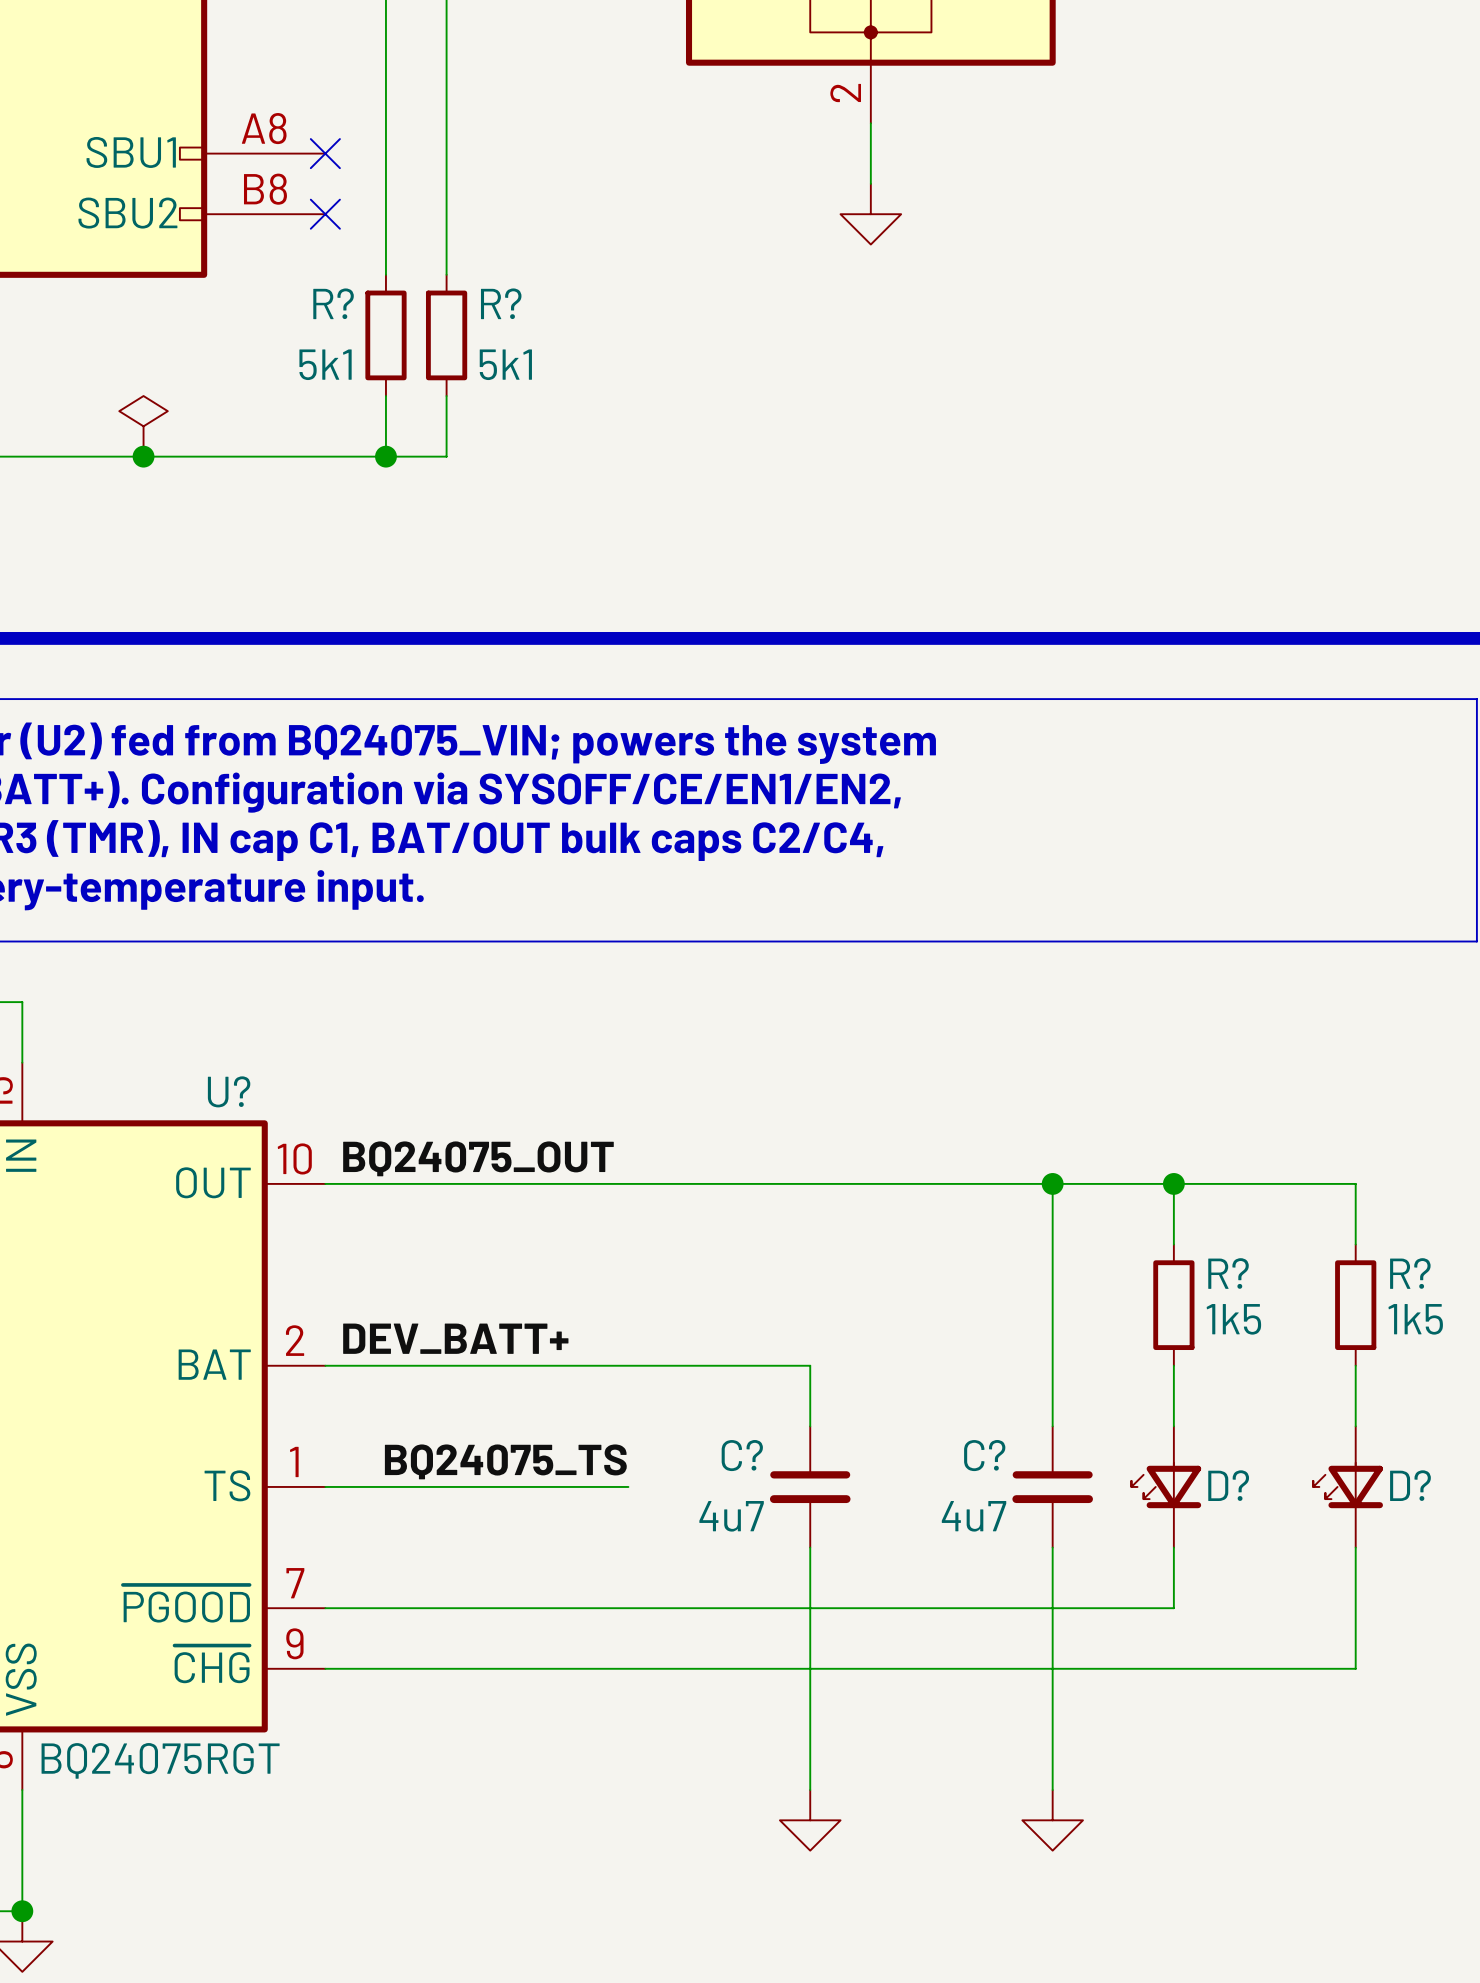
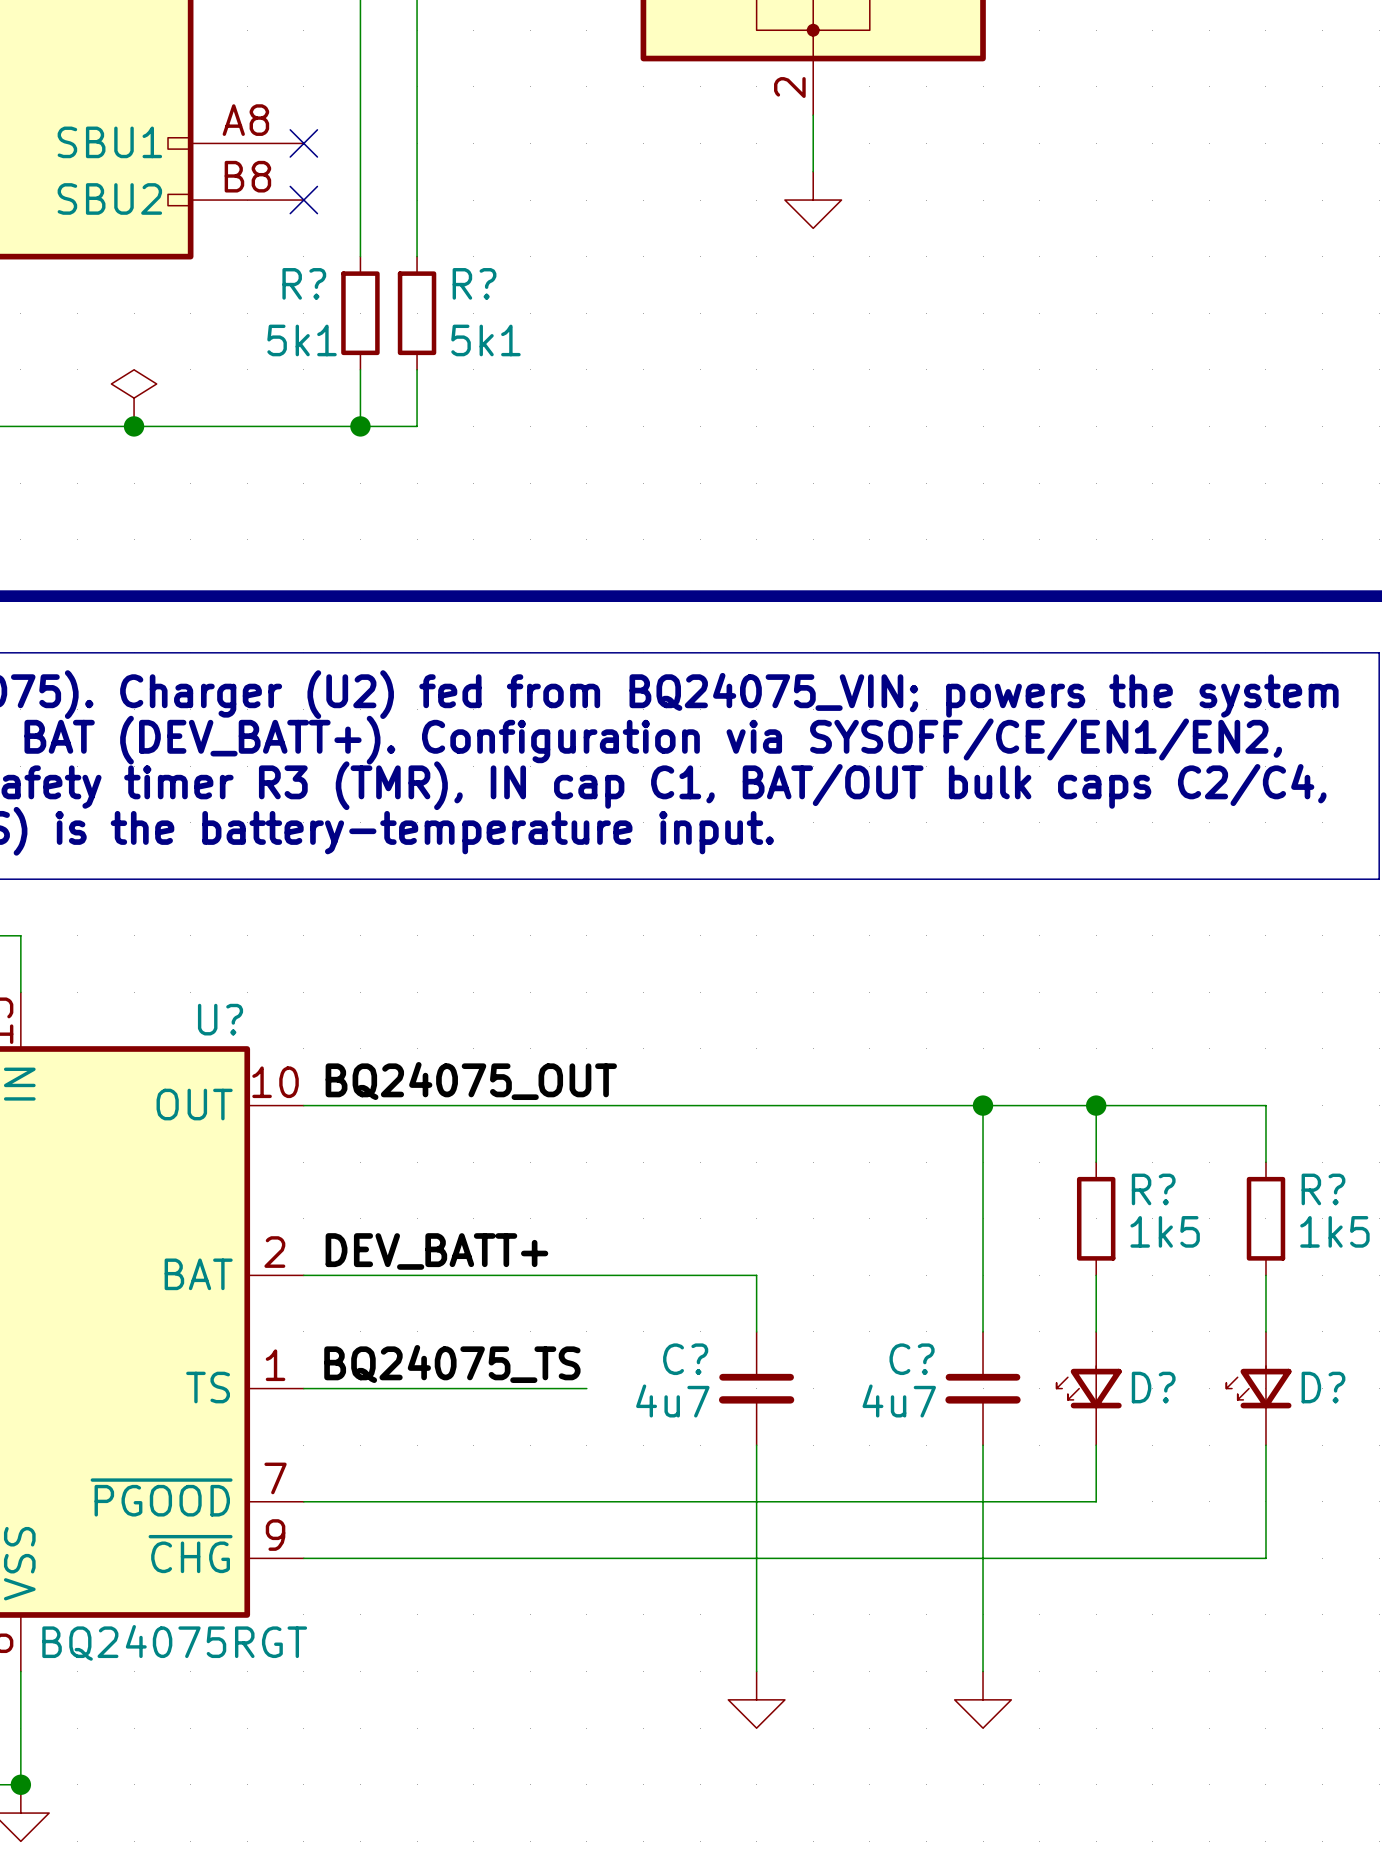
R? value position: 5k1 (325, 364) -> 5k1 (302, 340)
C? value position: 4u7 (731, 1516) -> 4u7 (672, 1400)
C? value position: 4u7 (974, 1516) -> 4u7 (899, 1400)

